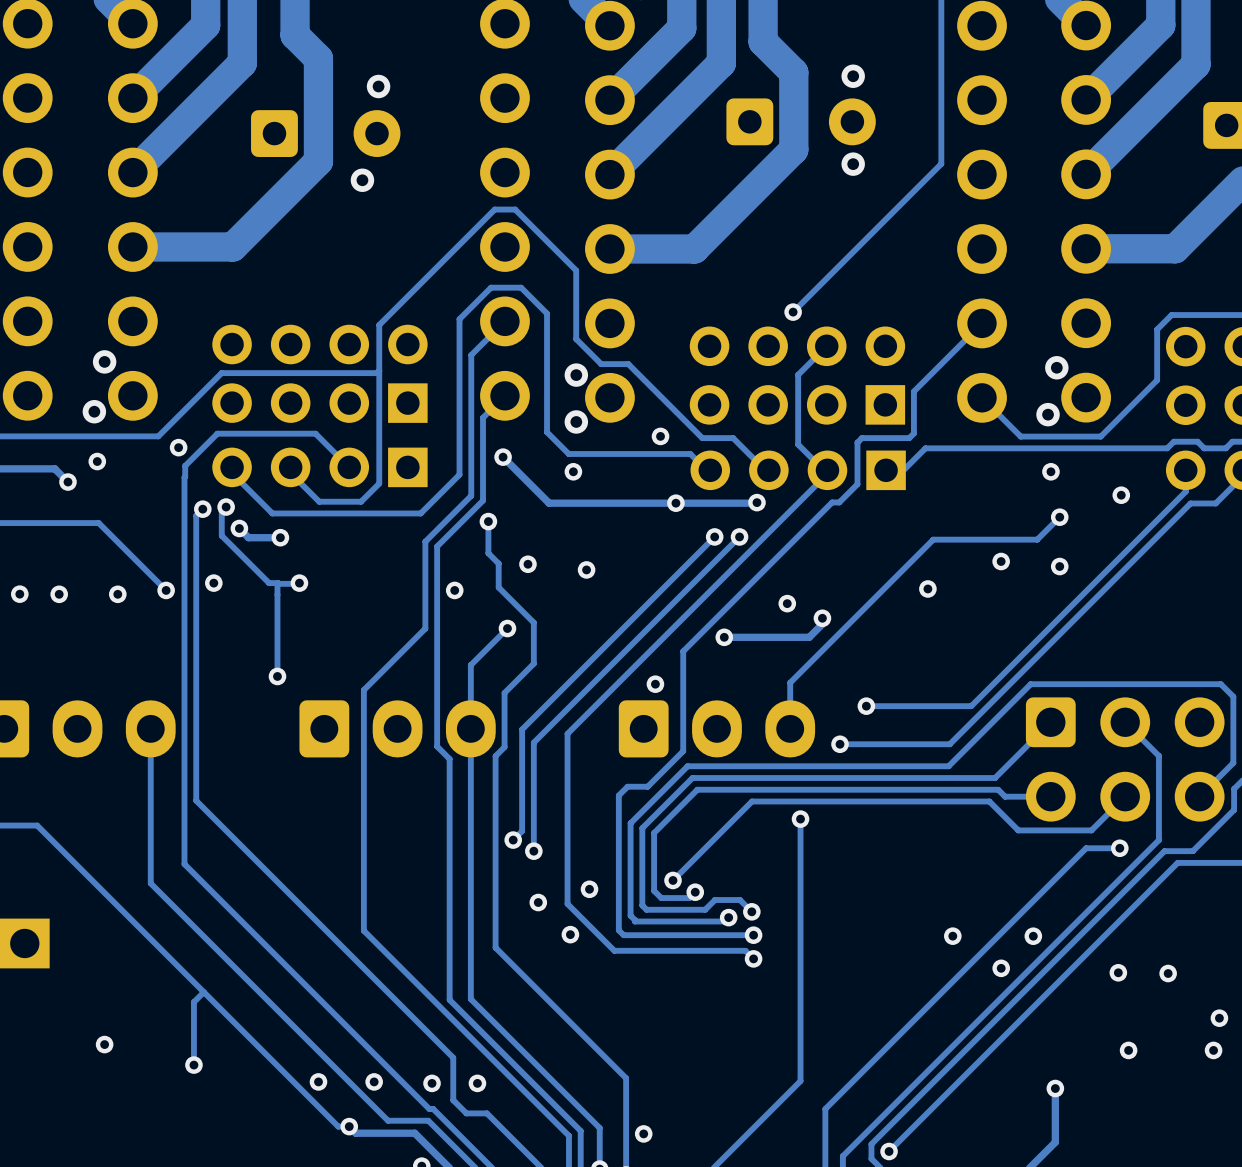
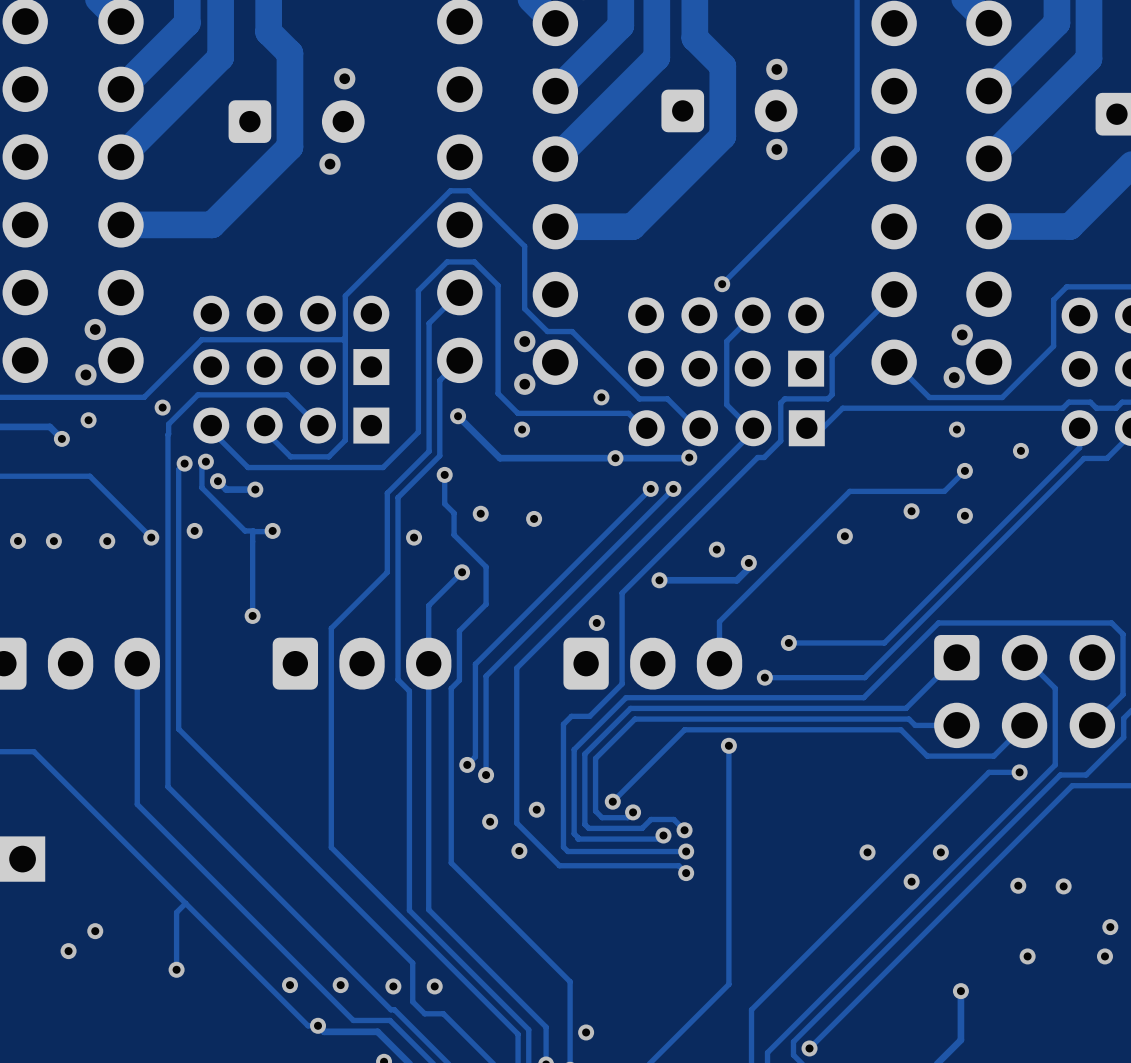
via: none -> (95, 931)
via: none -> (68, 951)
via: (104, 1044) -> none

